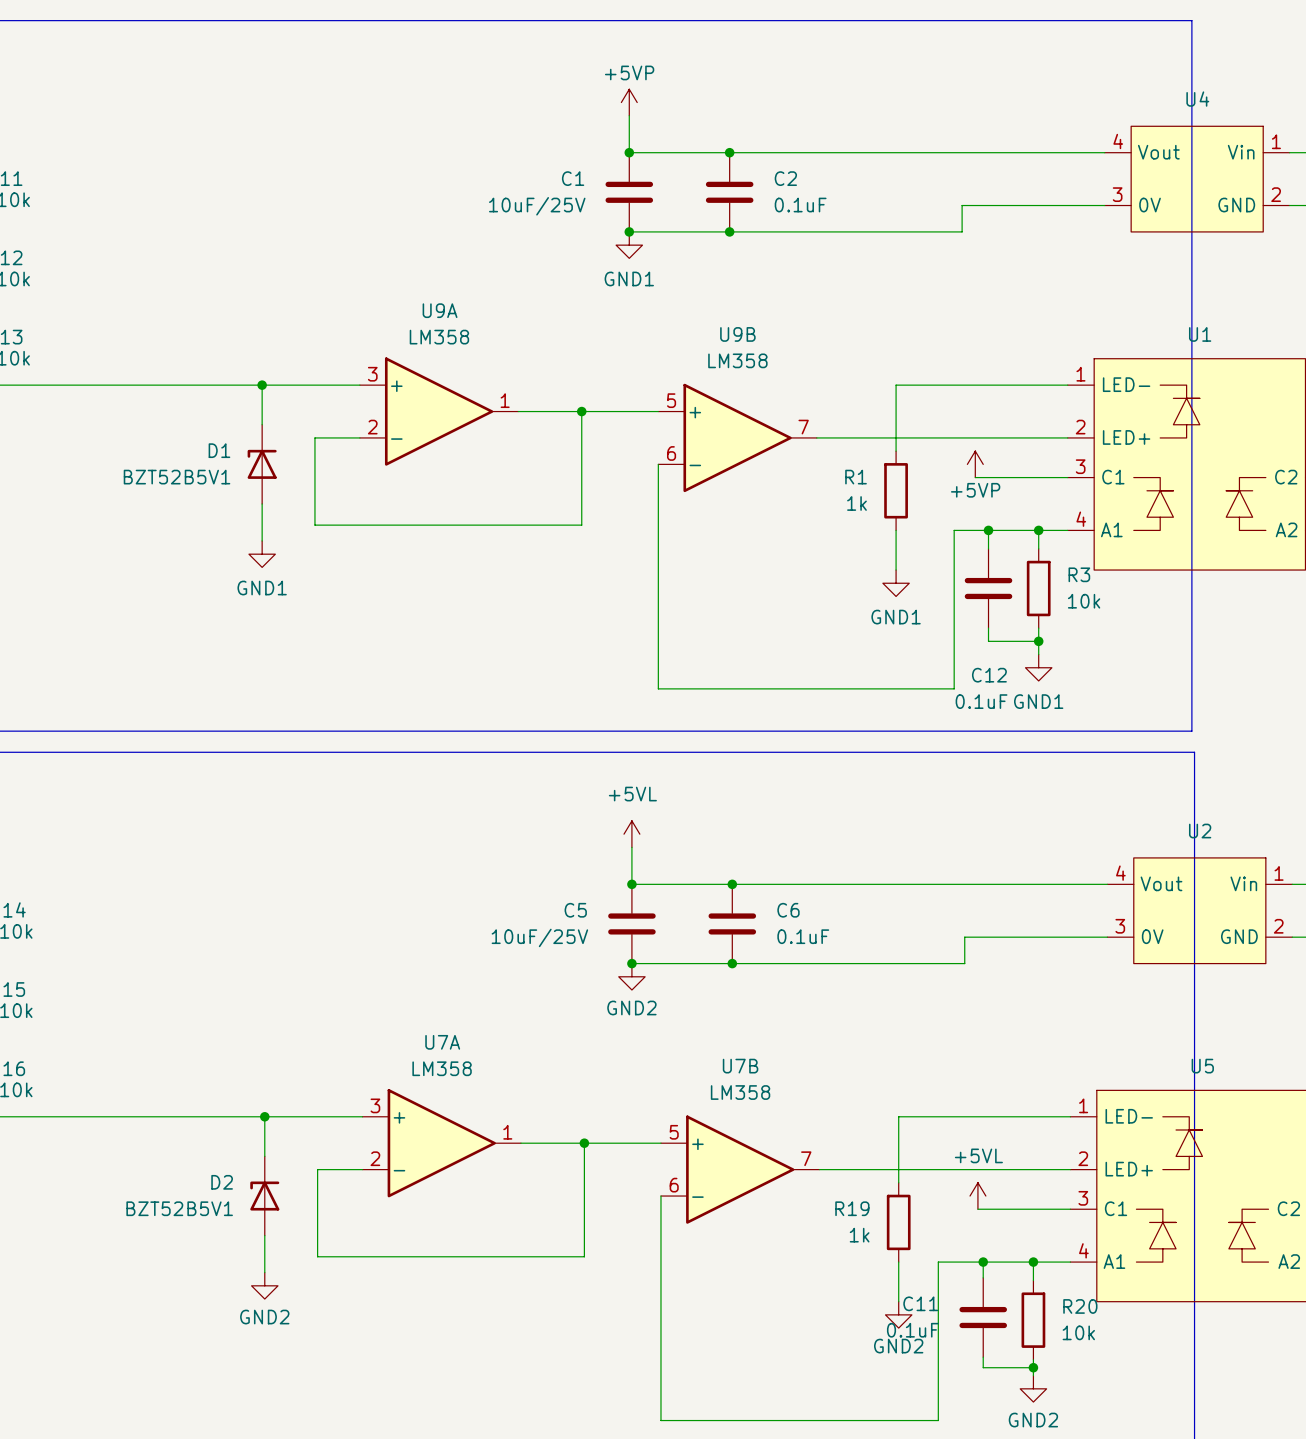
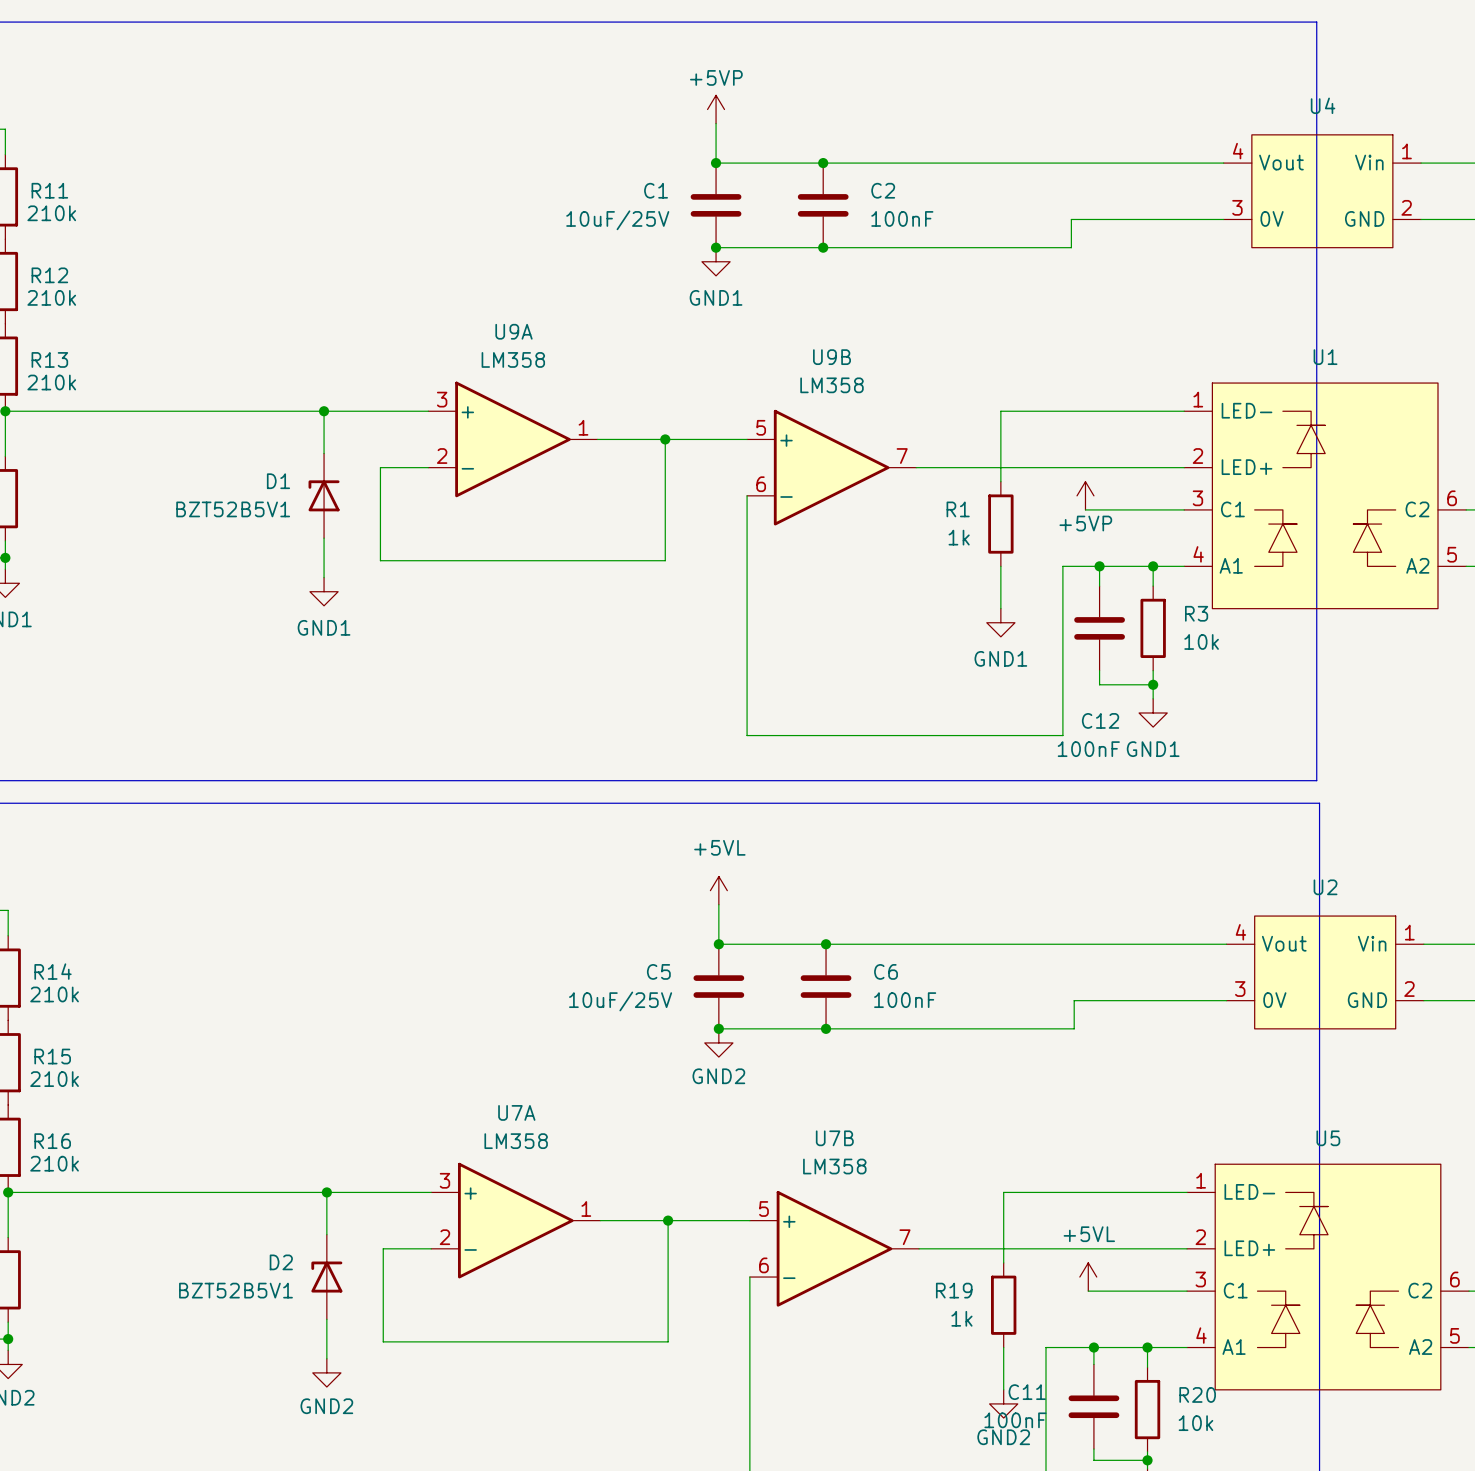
C2 value: 0.1uF (800, 205) -> 100nF (902, 218)
C12 value: 0.1uF (981, 701) -> 100nF (1088, 749)
C6 value: 0.1uF (803, 936) -> 100nF (905, 1000)
C11 value: 0.1uF (912, 1330) -> 100nF (1015, 1420)

